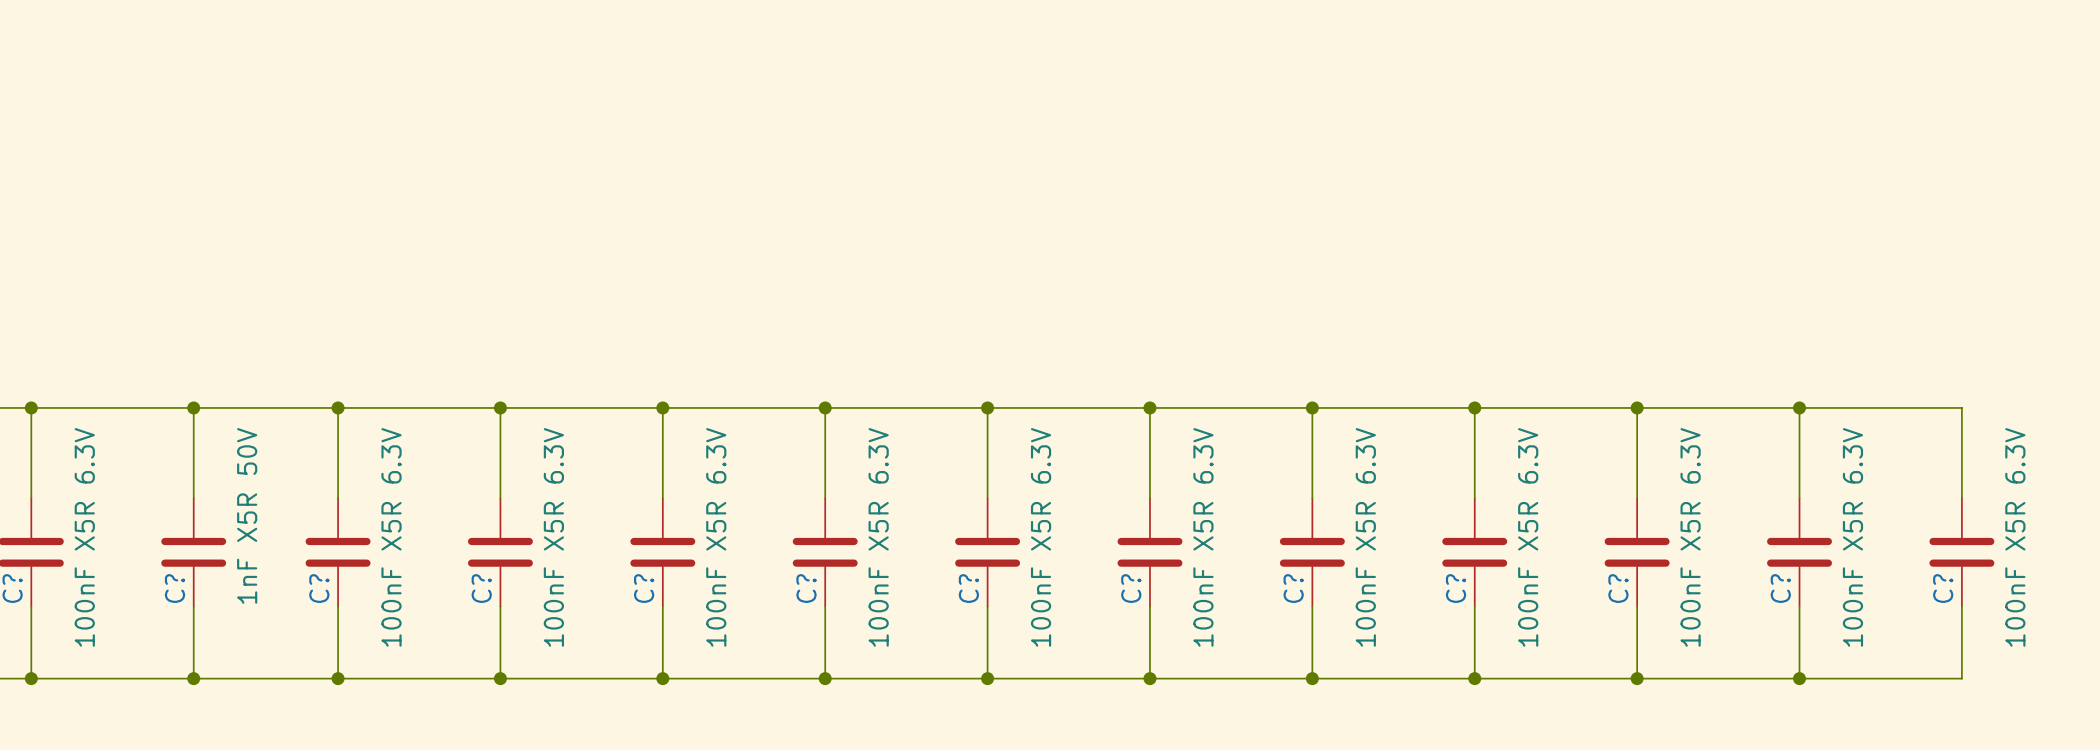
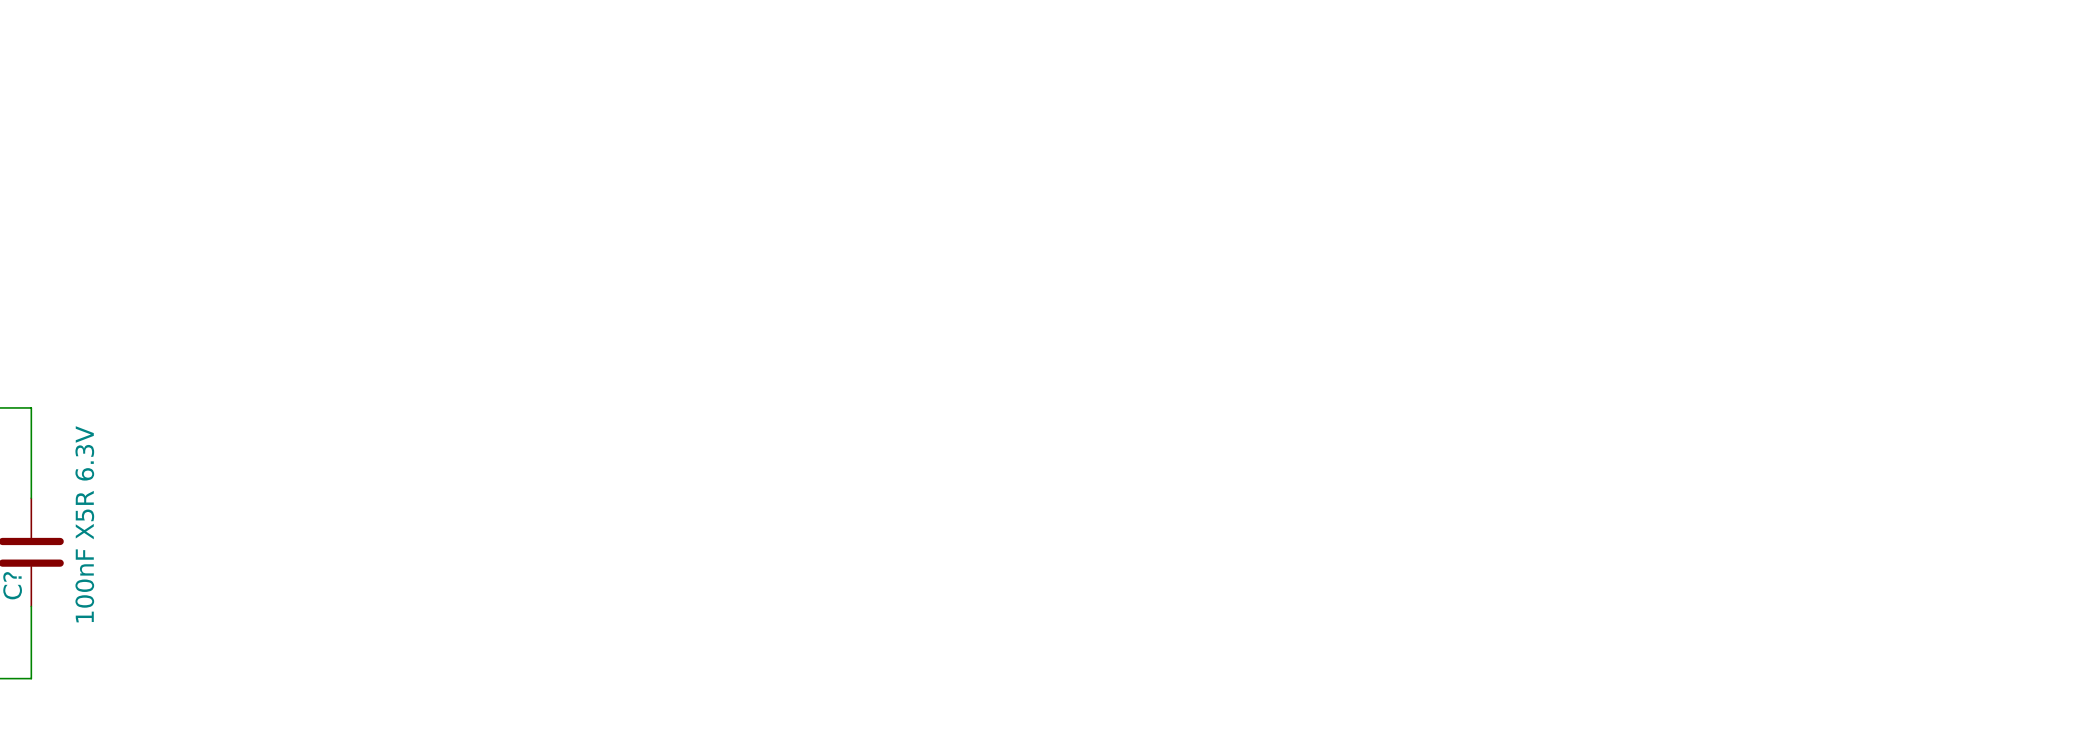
wire: (31, 407) (1961, 407) (1961, 498) -> none
junction: (31, 407) -> none
wire: (193, 407) (193, 498) -> none
junction: (193, 407) -> none
wire: (338, 407) (338, 498) -> none
junction: (338, 407) -> none
wire: (500, 407) (500, 498) -> none
junction: (500, 407) -> none
wire: (662, 407) (662, 498) -> none
junction: (662, 407) -> none
wire: (825, 407) (825, 498) -> none
junction: (825, 407) -> none
wire: (987, 407) (987, 498) -> none
junction: (987, 407) -> none
wire: (1149, 407) (1149, 498) -> none
junction: (1149, 407) -> none
wire: (1312, 407) (1312, 498) -> none
junction: (1312, 407) -> none
wire: (1474, 407) (1474, 498) -> none
junction: (1474, 407) -> none
wire: (1637, 407) (1637, 498) -> none
junction: (1637, 407) -> none
wire: (1799, 407) (1799, 498) -> none
junction: (1799, 407) -> none
C?: 1nF X5R 50V (193, 552) -> none
C?: 100nF X5R 6.3V (338, 552) -> none
C?: 100nF X5R 6.3V (500, 552) -> none
C?: 100nF X5R 6.3V (662, 552) -> none
C?: 100nF X5R 6.3V (825, 552) -> none
C?: 100nF X5R 6.3V (987, 552) -> none
C?: 100nF X5R 6.3V (1149, 552) -> none
C?: 100nF X5R 6.3V (1312, 552) -> none
C?: 100nF X5R 6.3V (1474, 552) -> none
C?: 100nF X5R 6.3V (1637, 552) -> none
C?: 100nF X5R 6.3V (1799, 552) -> none
C?: 100nF X5R 6.3V (1961, 552) -> none
wire: (193, 606) (193, 678) -> none
wire: (338, 606) (338, 678) -> none
wire: (500, 606) (500, 678) -> none
wire: (662, 606) (662, 678) -> none
wire: (825, 606) (825, 678) -> none
wire: (987, 606) (987, 678) -> none
wire: (1149, 606) (1149, 678) -> none
wire: (1312, 606) (1312, 678) -> none
wire: (1474, 606) (1474, 678) -> none
wire: (1637, 606) (1637, 678) -> none
wire: (1799, 606) (1799, 678) -> none
wire: (1961, 606) (1961, 678) (31, 678) -> none
junction: (31, 678) -> none
junction: (193, 678) -> none
junction: (338, 678) -> none
junction: (500, 678) -> none
junction: (662, 678) -> none
junction: (825, 678) -> none
junction: (987, 678) -> none
junction: (1149, 678) -> none
junction: (1312, 678) -> none
junction: (1474, 678) -> none
junction: (1637, 678) -> none
junction: (1799, 678) -> none

